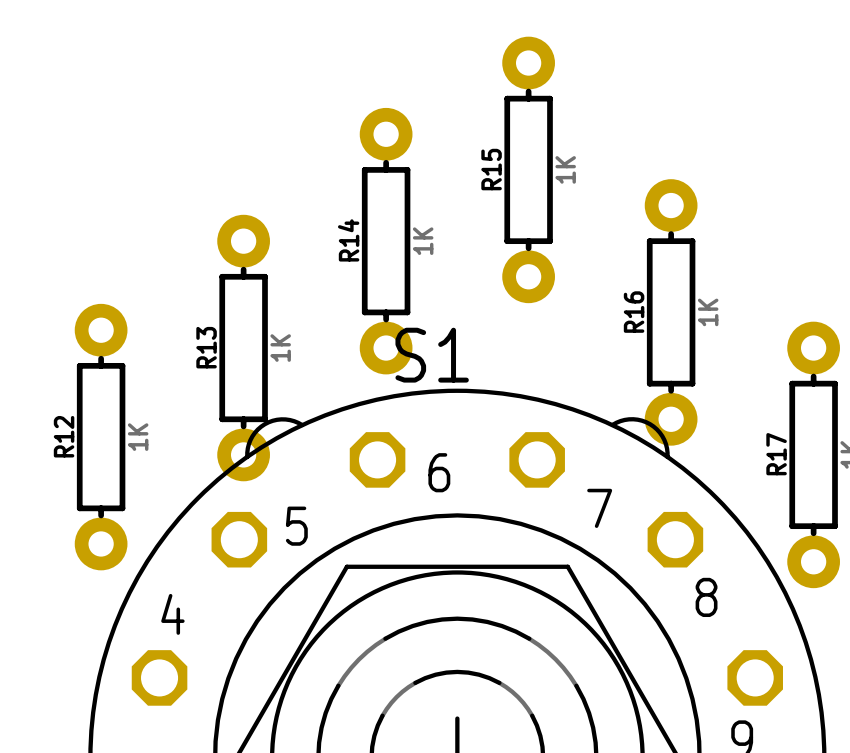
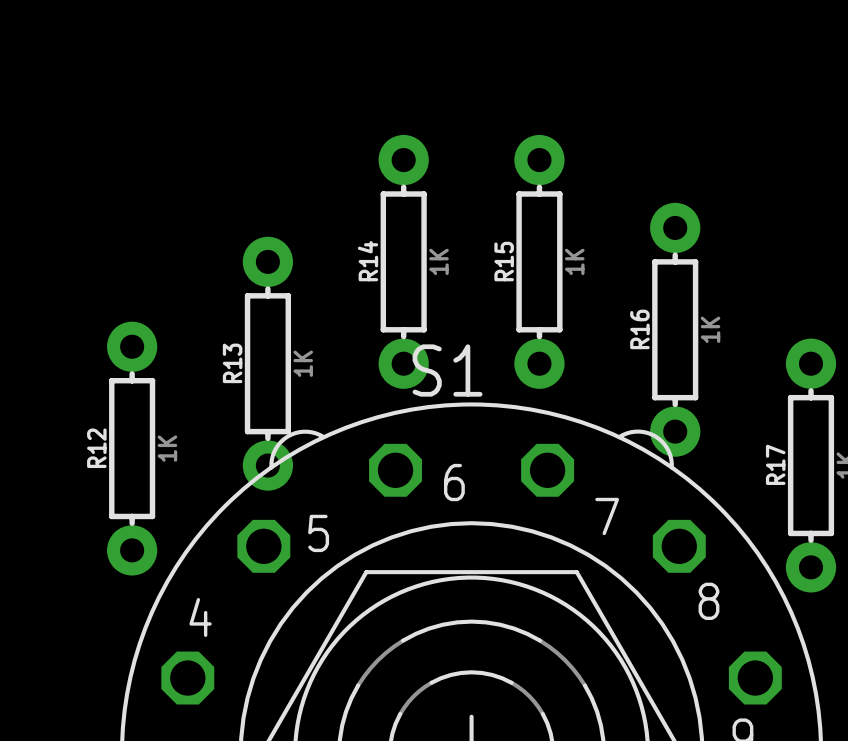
R15 position: (528, 169) -> (539, 261)

